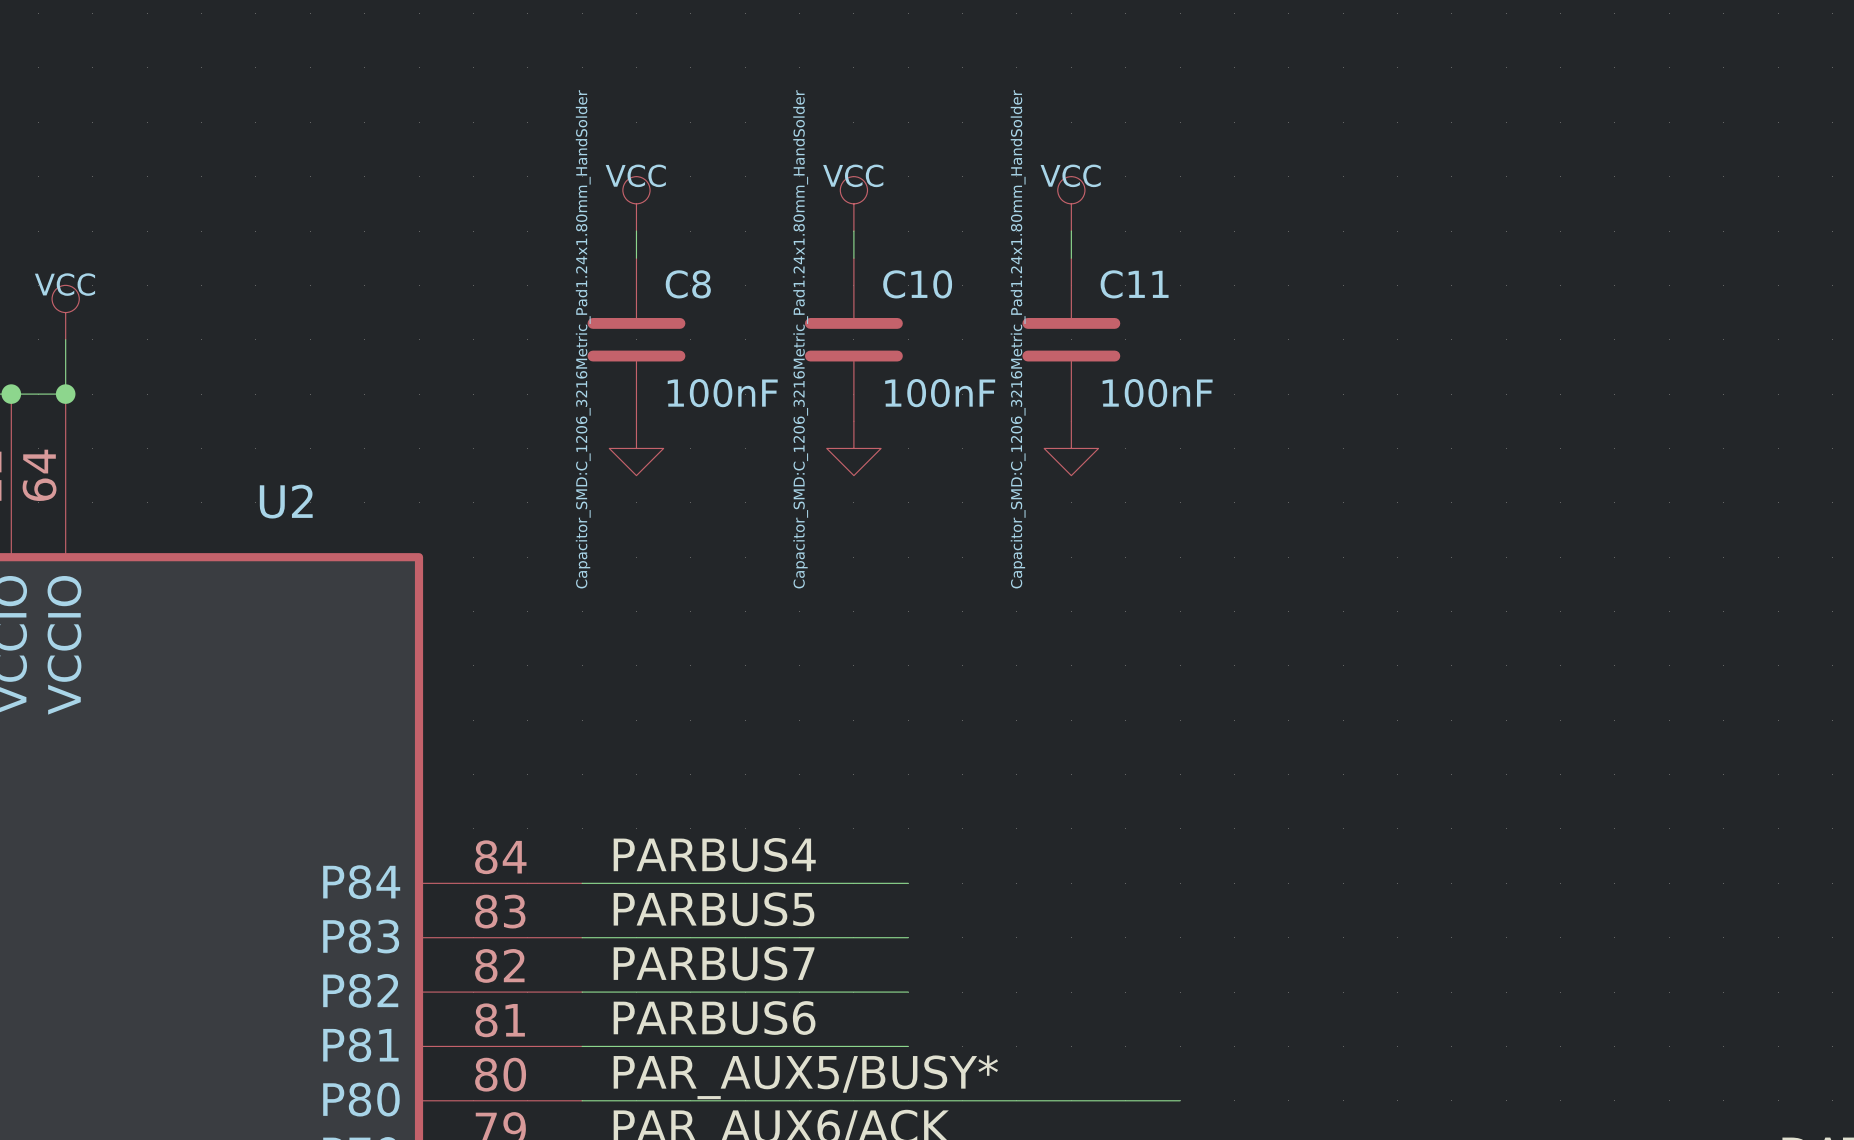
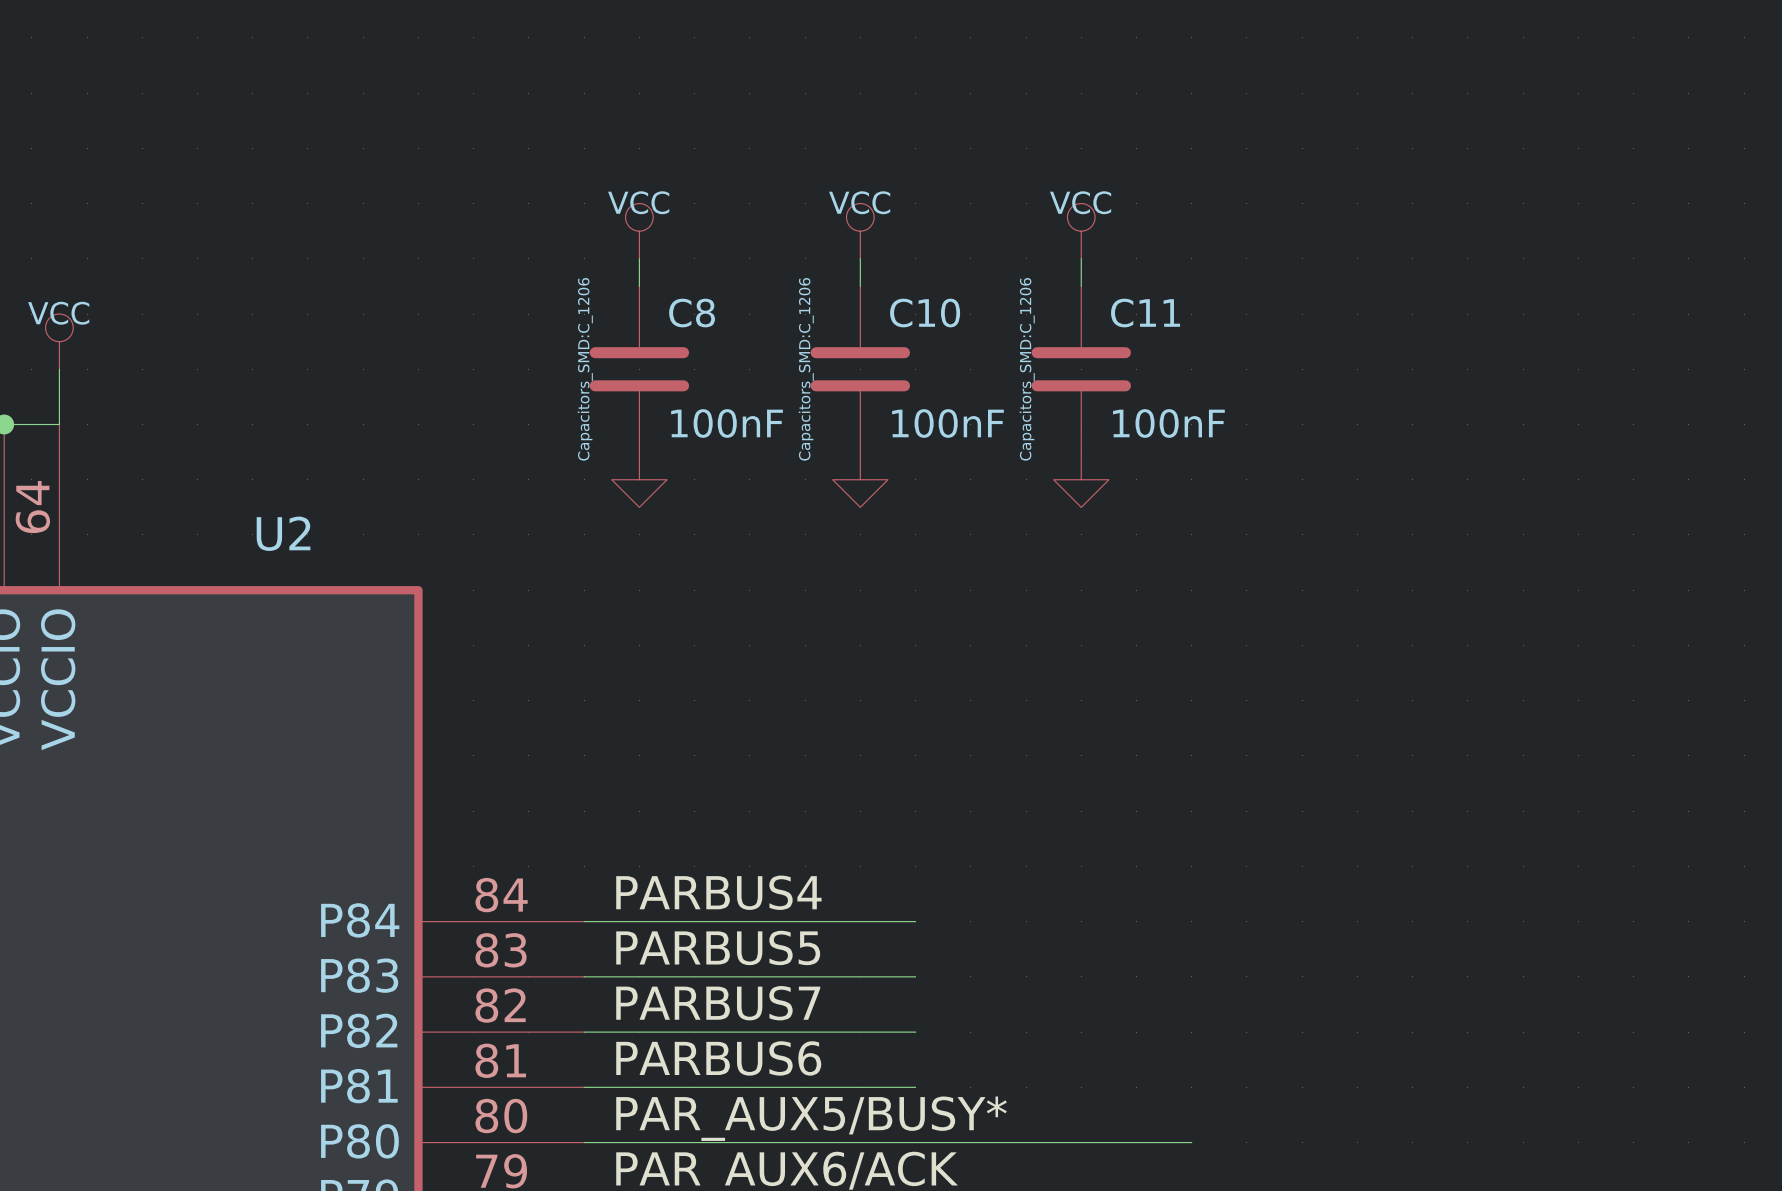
C8 text: Capacitor_SMD:C_1206_3216Metric_Pad1.24x1.80mm_HandSolder (583, 339) -> Capacitors_SMD:C_1206 (585, 369)
C10 text: Capacitor_SMD:C_1206_3216Metric_Pad1.24x1.80mm_HandSolder (800, 339) -> Capacitors_SMD:C_1206 (806, 369)
C11 text: Capacitor_SMD:C_1206_3216Metric_Pad1.24x1.80mm_HandSolder (1018, 339) -> Capacitors_SMD:C_1206 (1027, 369)
junction: (65, 394) -> none

